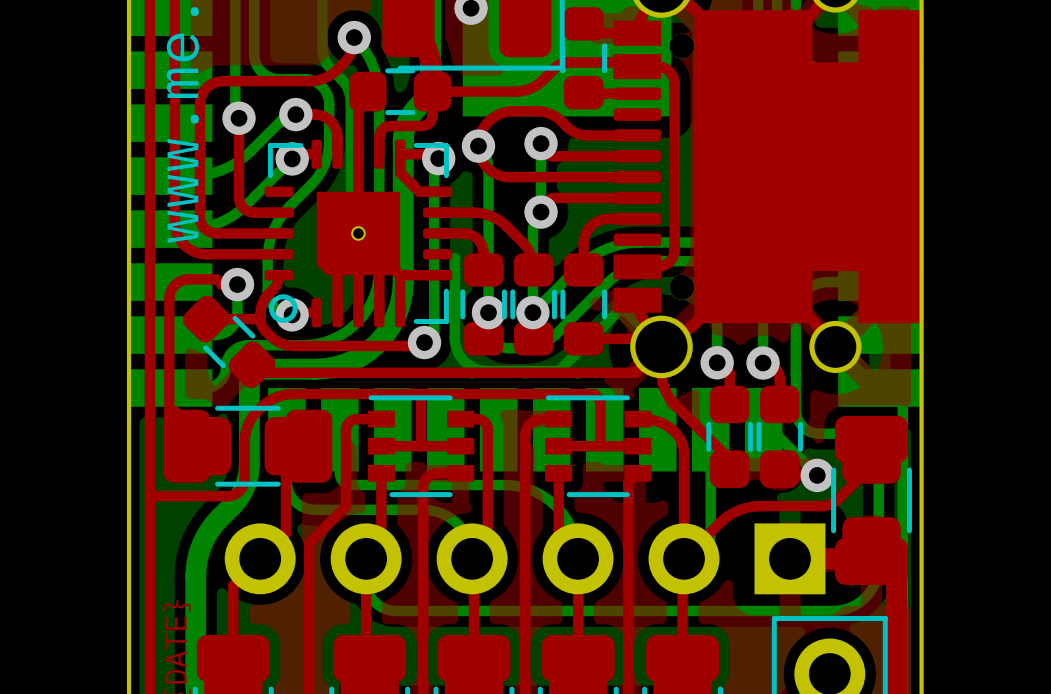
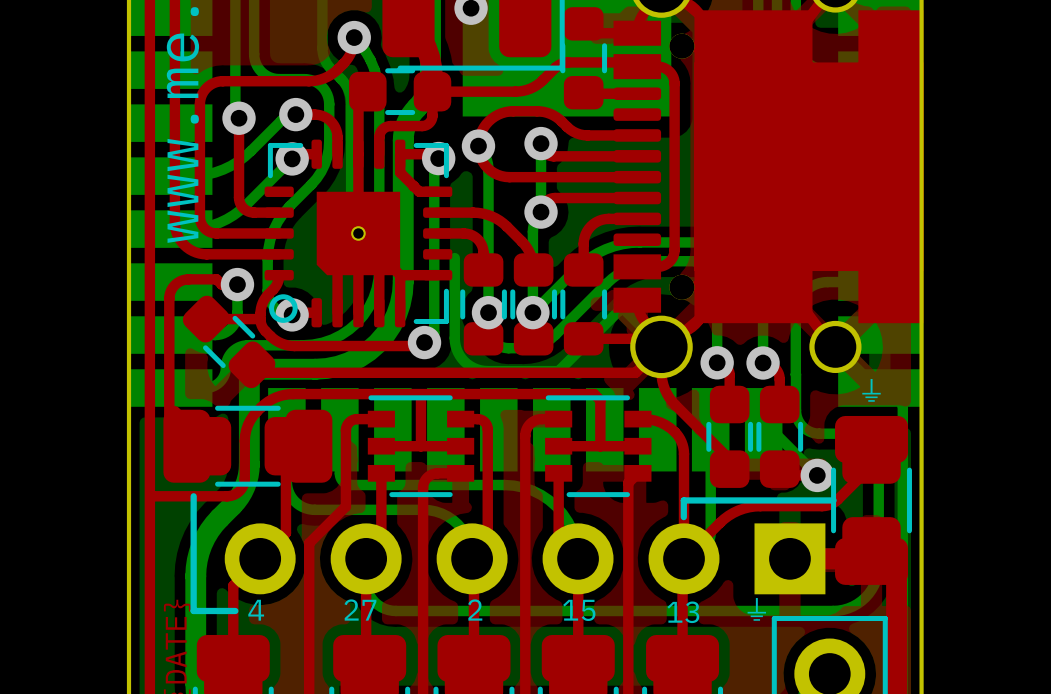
text: none -> ⏚ (871, 390)
line: none -> (193, 496) (193, 610) (235, 610)
line: none -> (833, 500) (683, 500) (683, 517)
text: none -> ⏚ (756, 609)
text: none -> 4 (256, 610)
text: none -> 27 (360, 610)
text: none -> 2 (475, 610)
text: none -> 15 (579, 610)
text: none -> 13 (683, 612)

